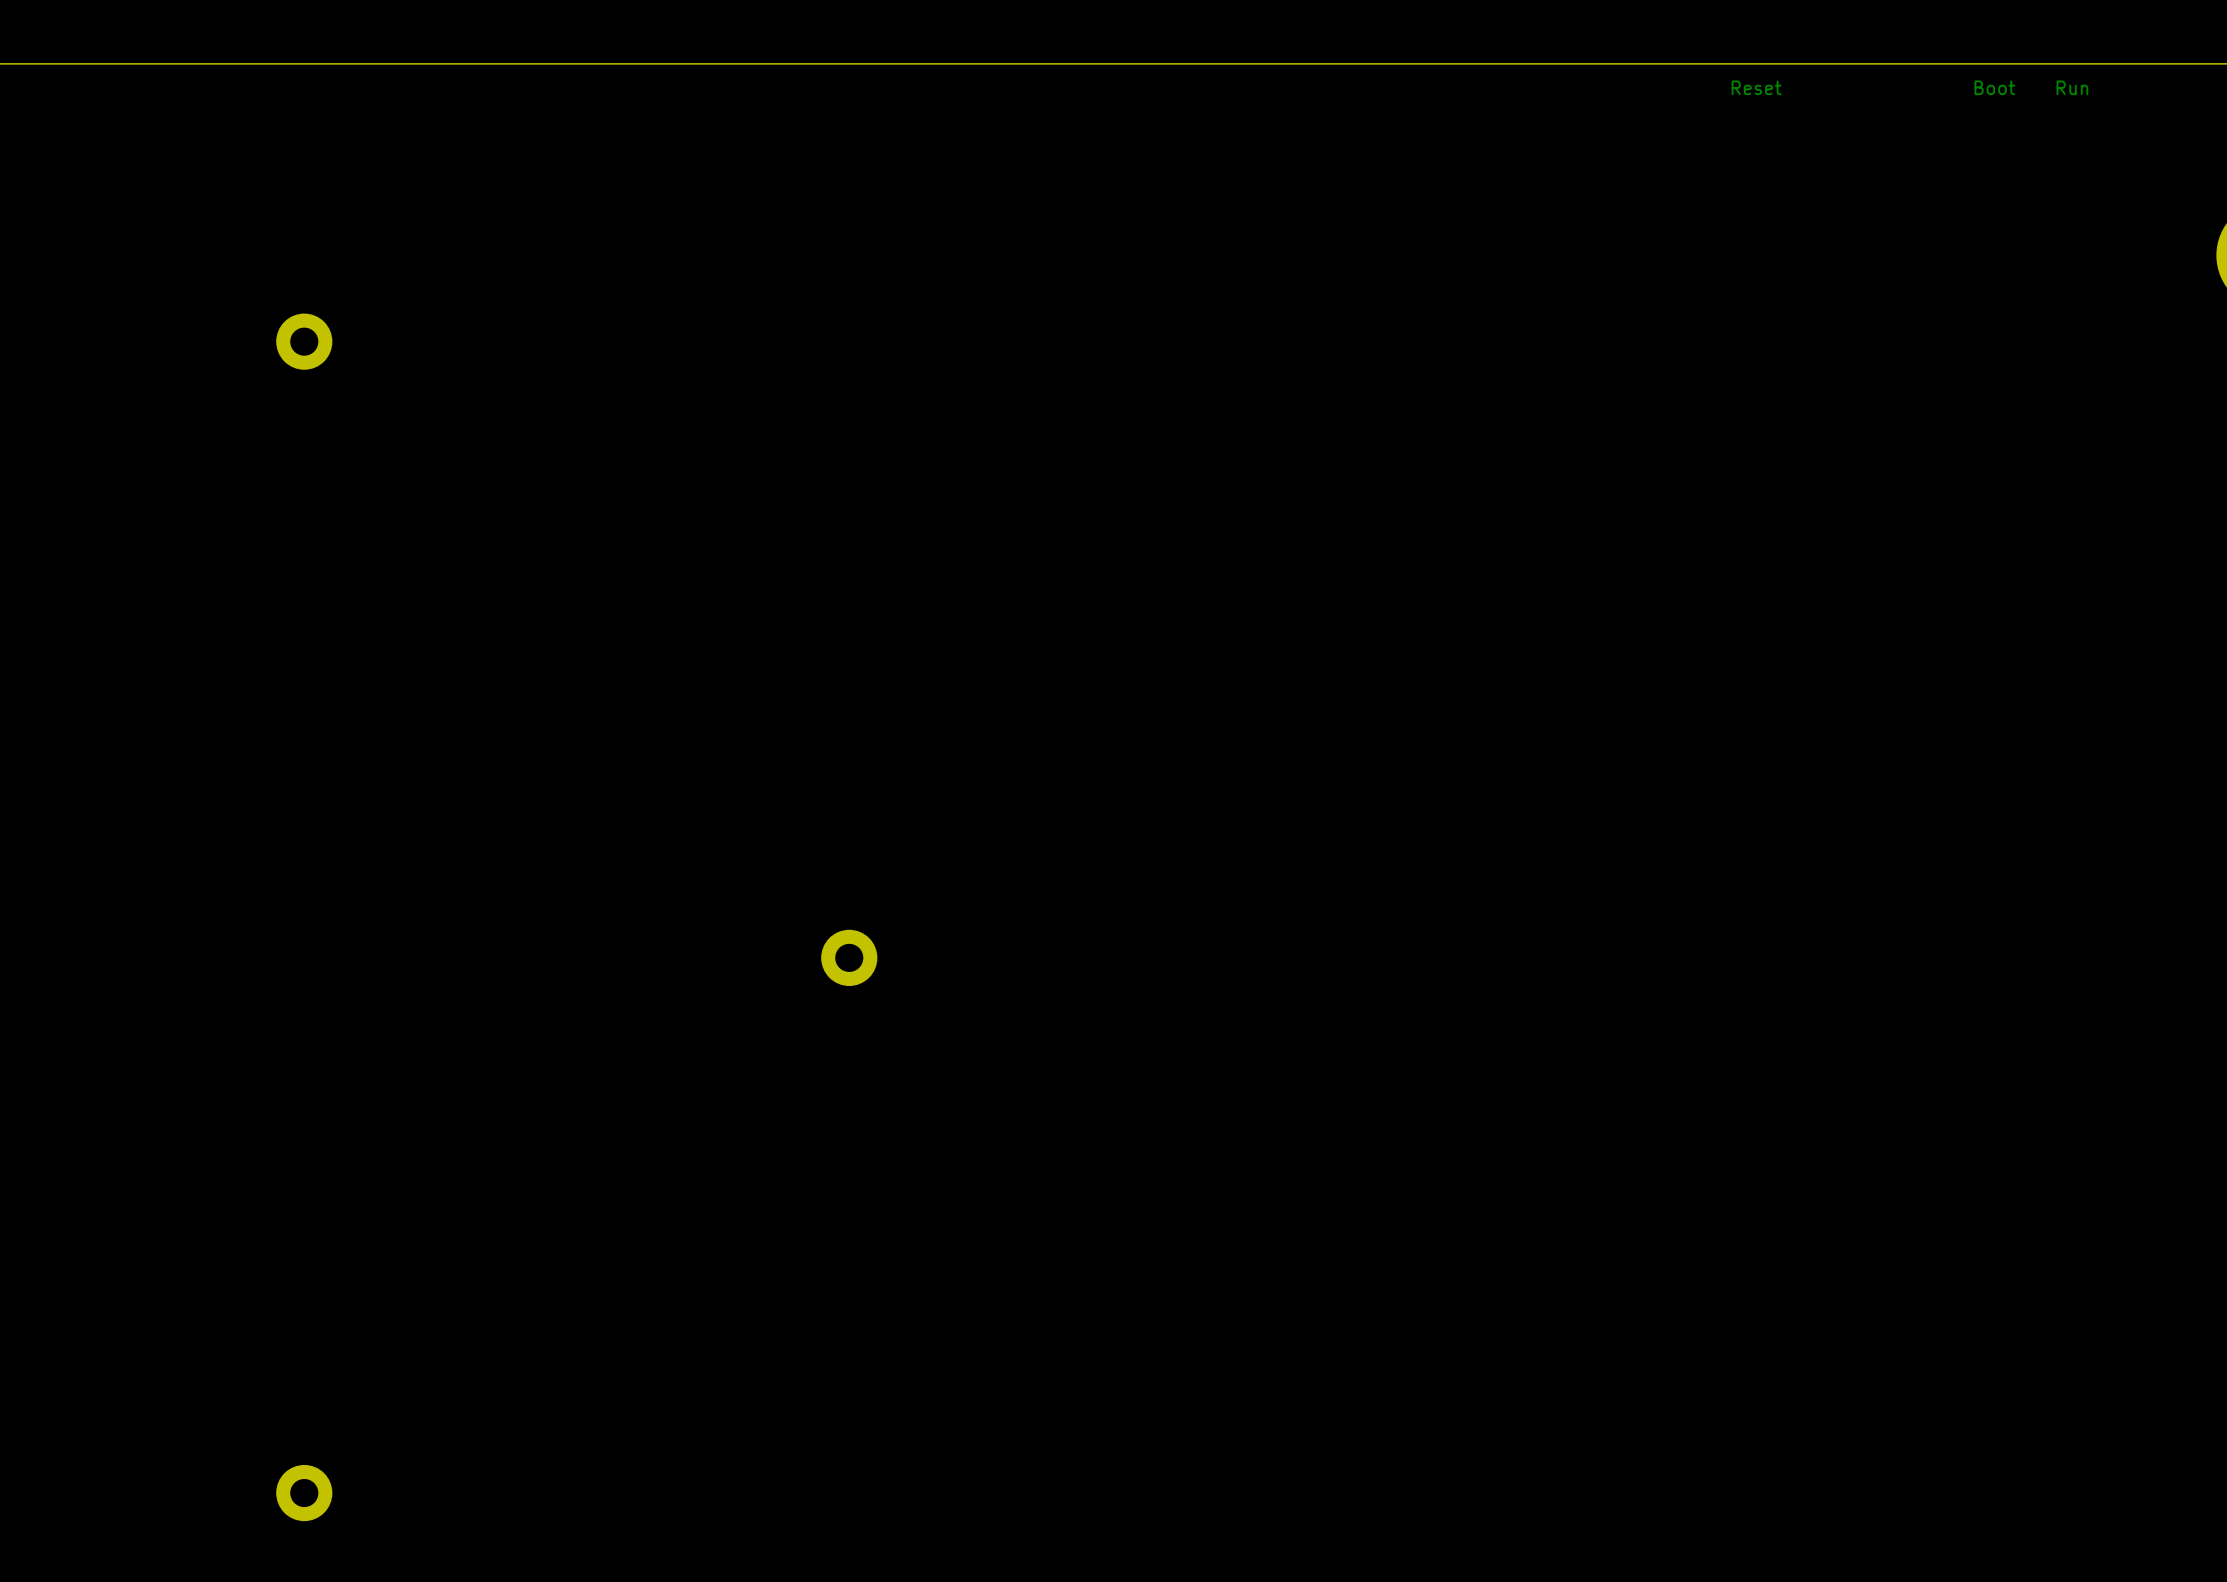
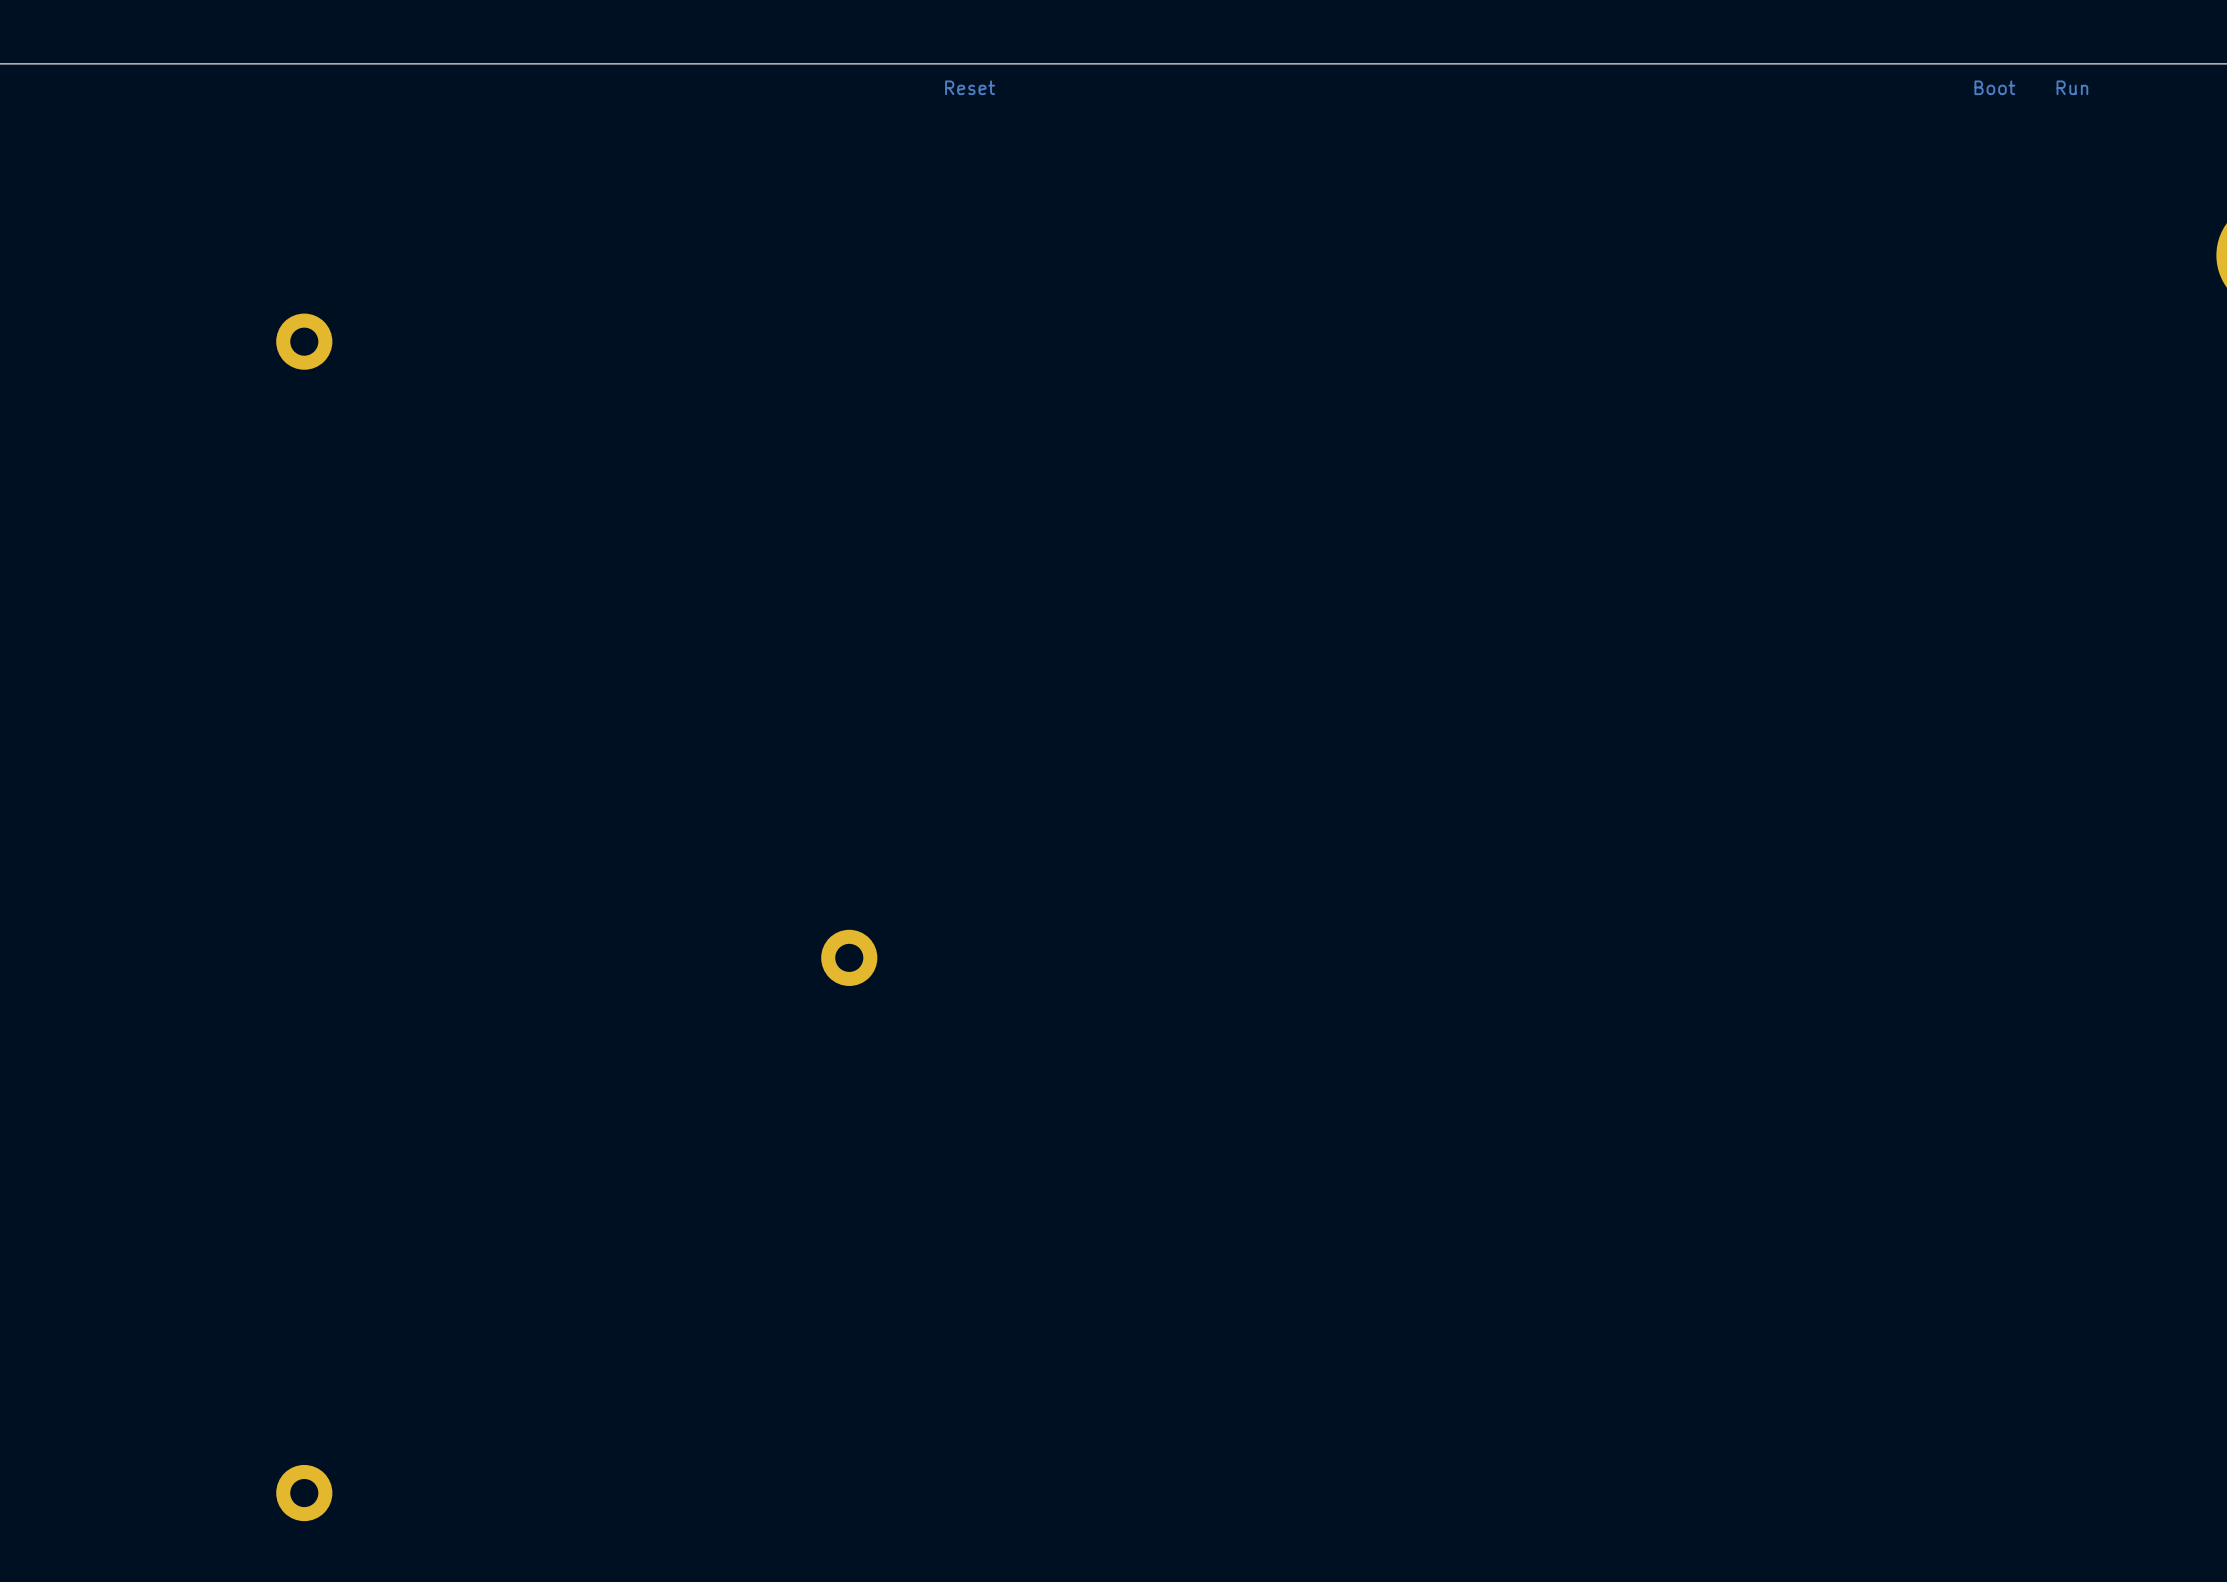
text: none -> Reset (970, 87)
text: Reset (1756, 87) -> none

